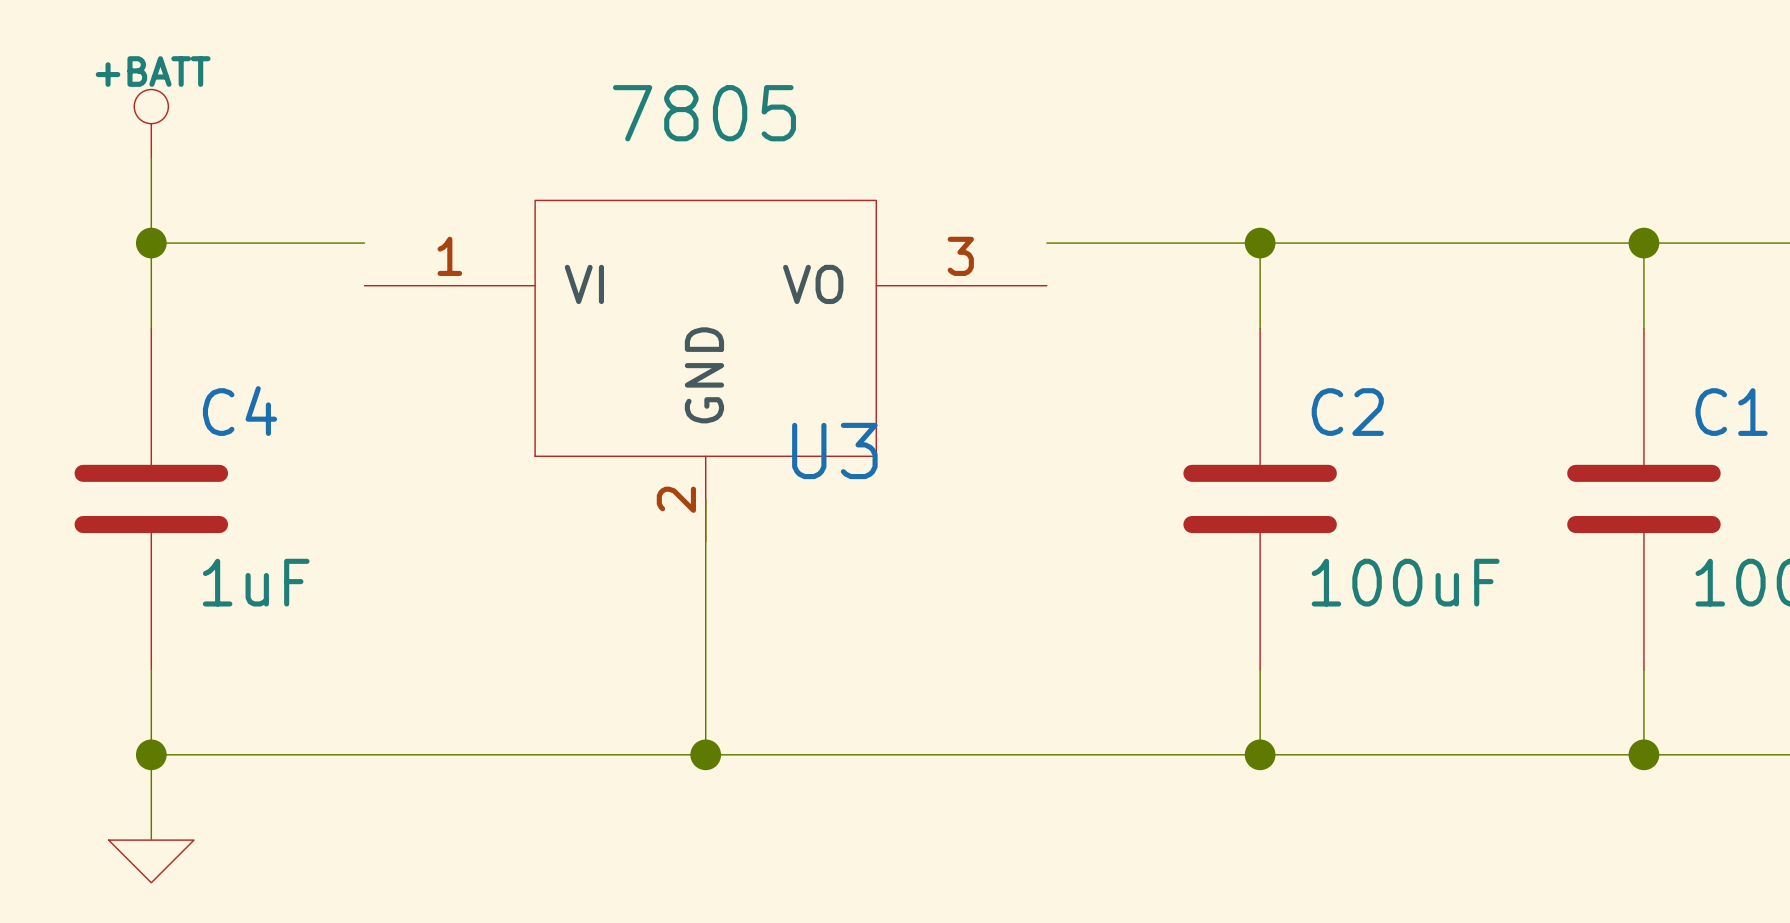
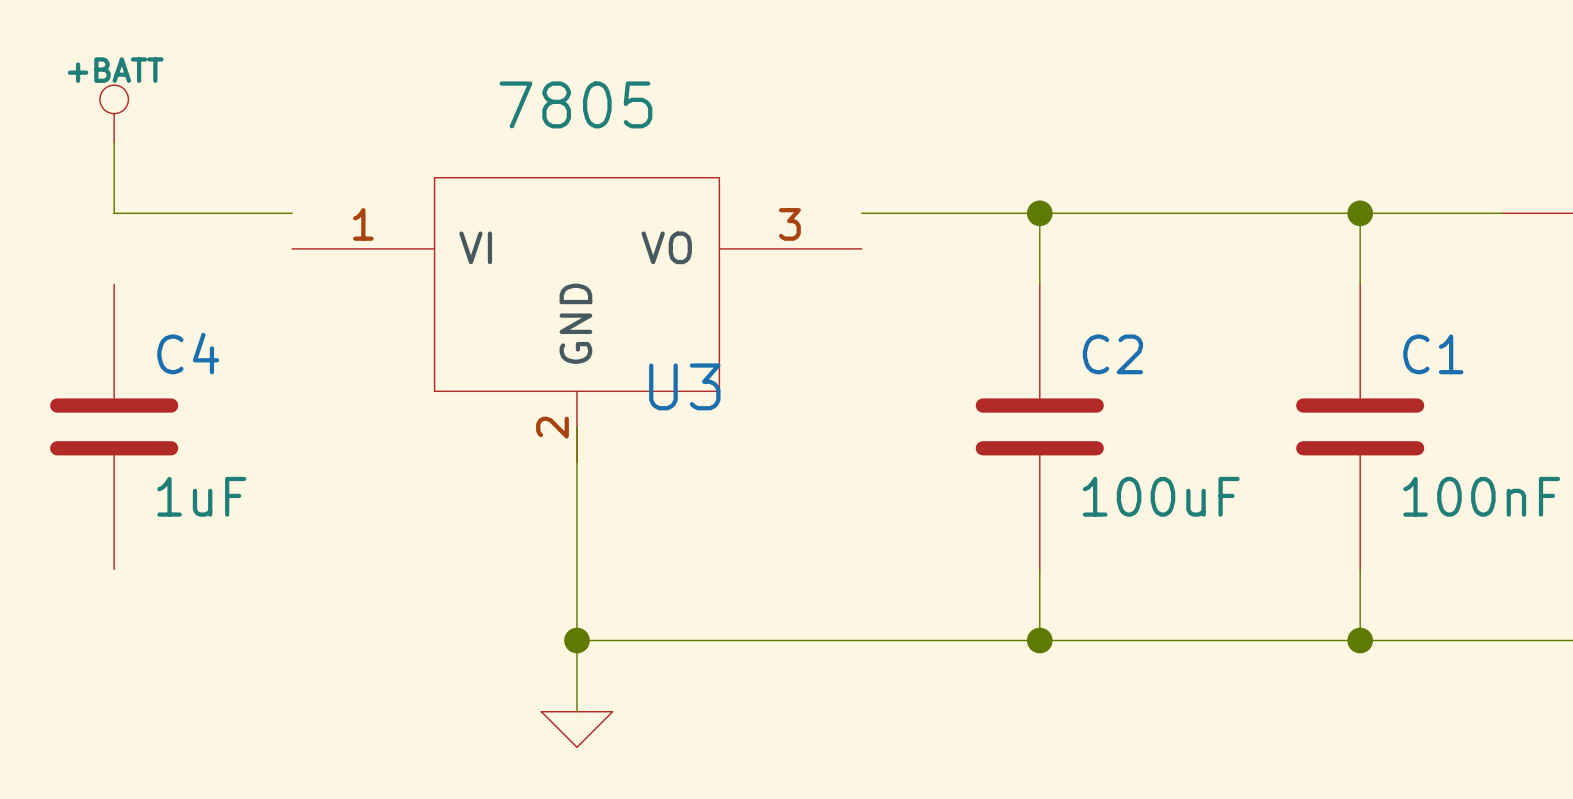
wire: (151, 243) (151, 328) -> none
junction: (151, 243) -> none
wire: (151, 669) (151, 840) -> none
wire: (151, 754) (705, 754) -> (576, 711) (576, 640)
junction: (151, 754) -> none
power symbol position: (151, 861) -> (576, 729)

